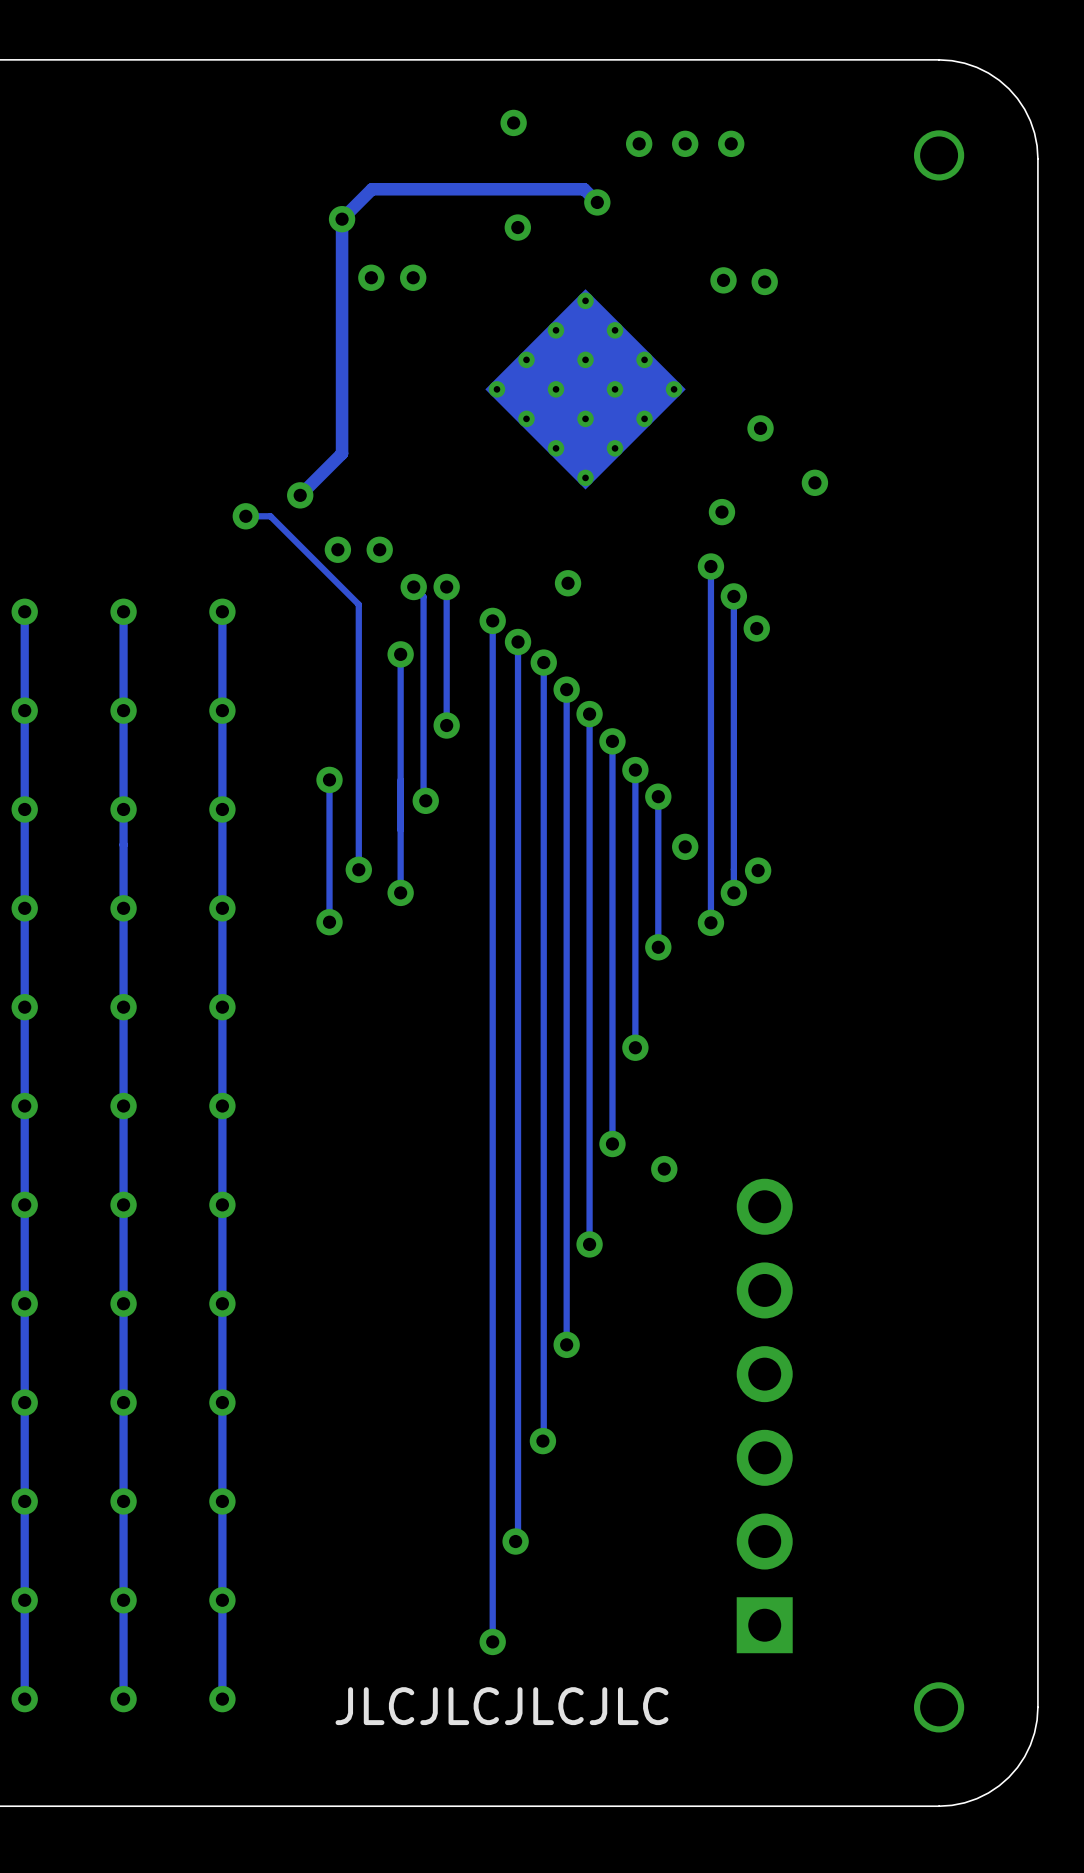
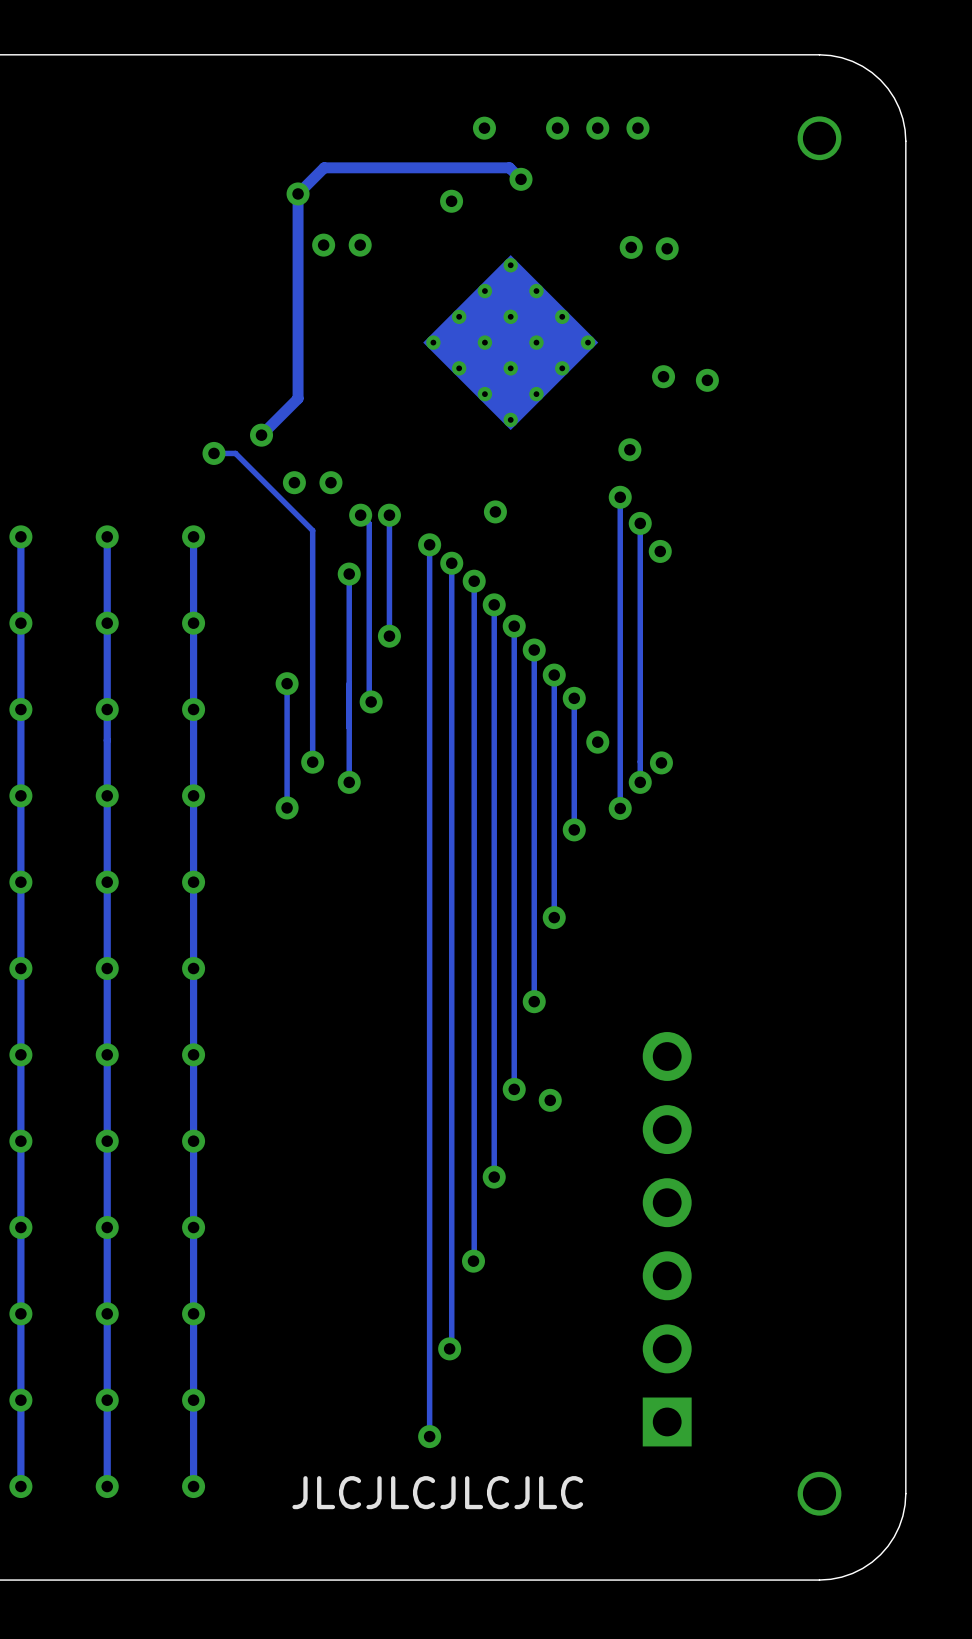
via position: (513, 122) -> (484, 128)
via position: (814, 482) -> (707, 380)
via position: (664, 1169) -> (550, 1100)

